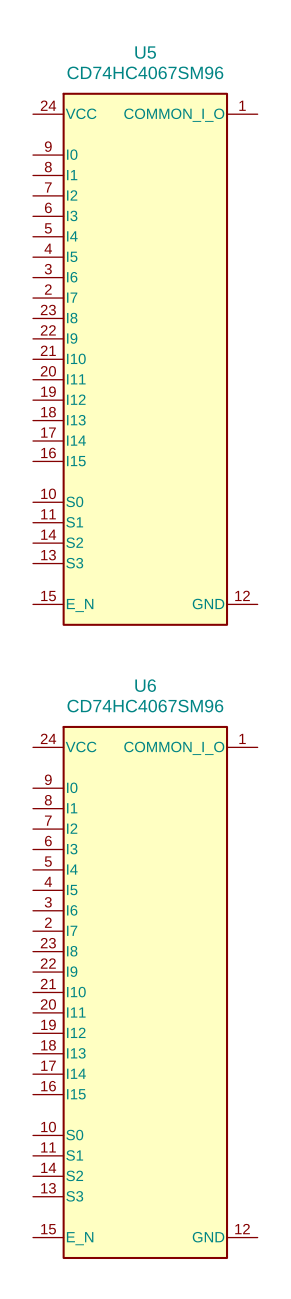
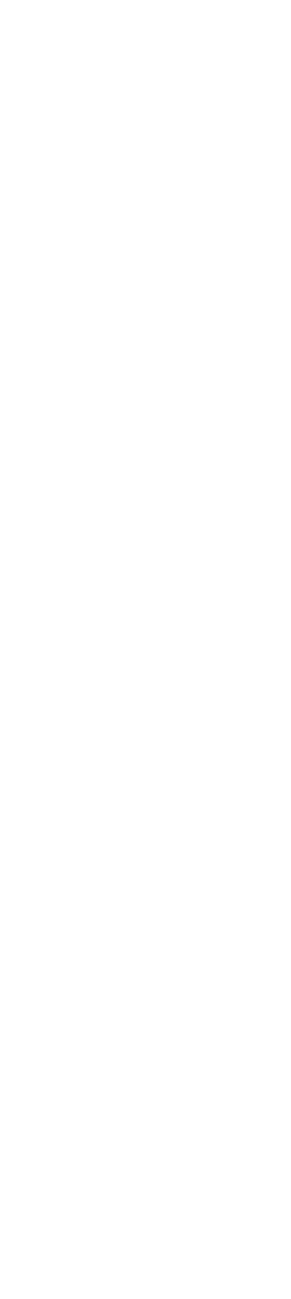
U5: CD74HC4067SM96 (145, 359) -> none
U6: CD74HC4067SM96 (145, 992) -> none

